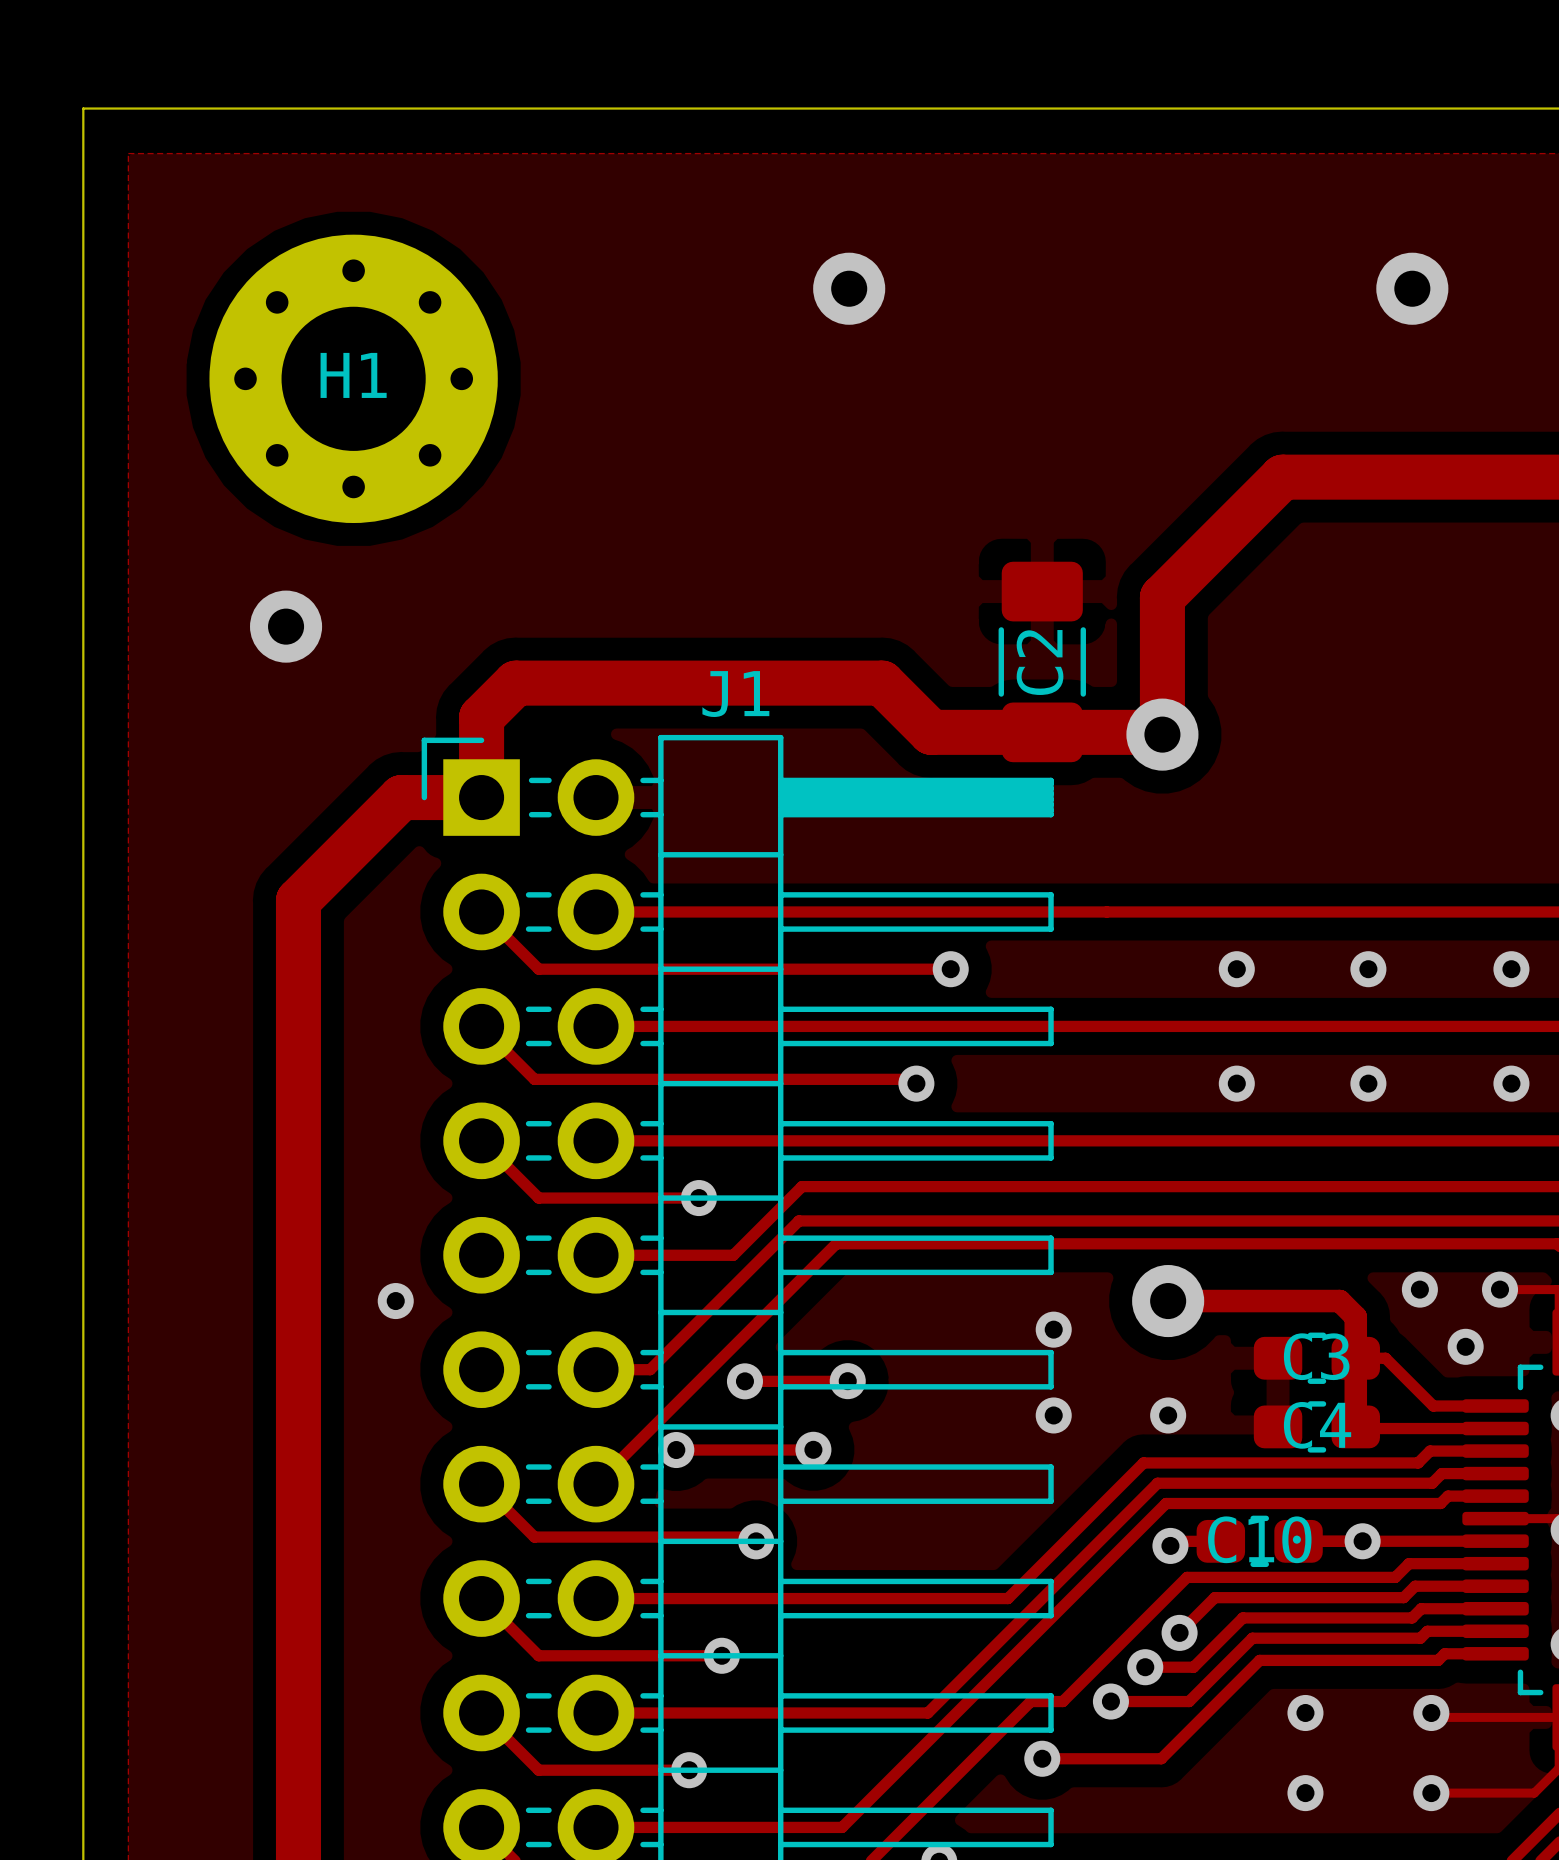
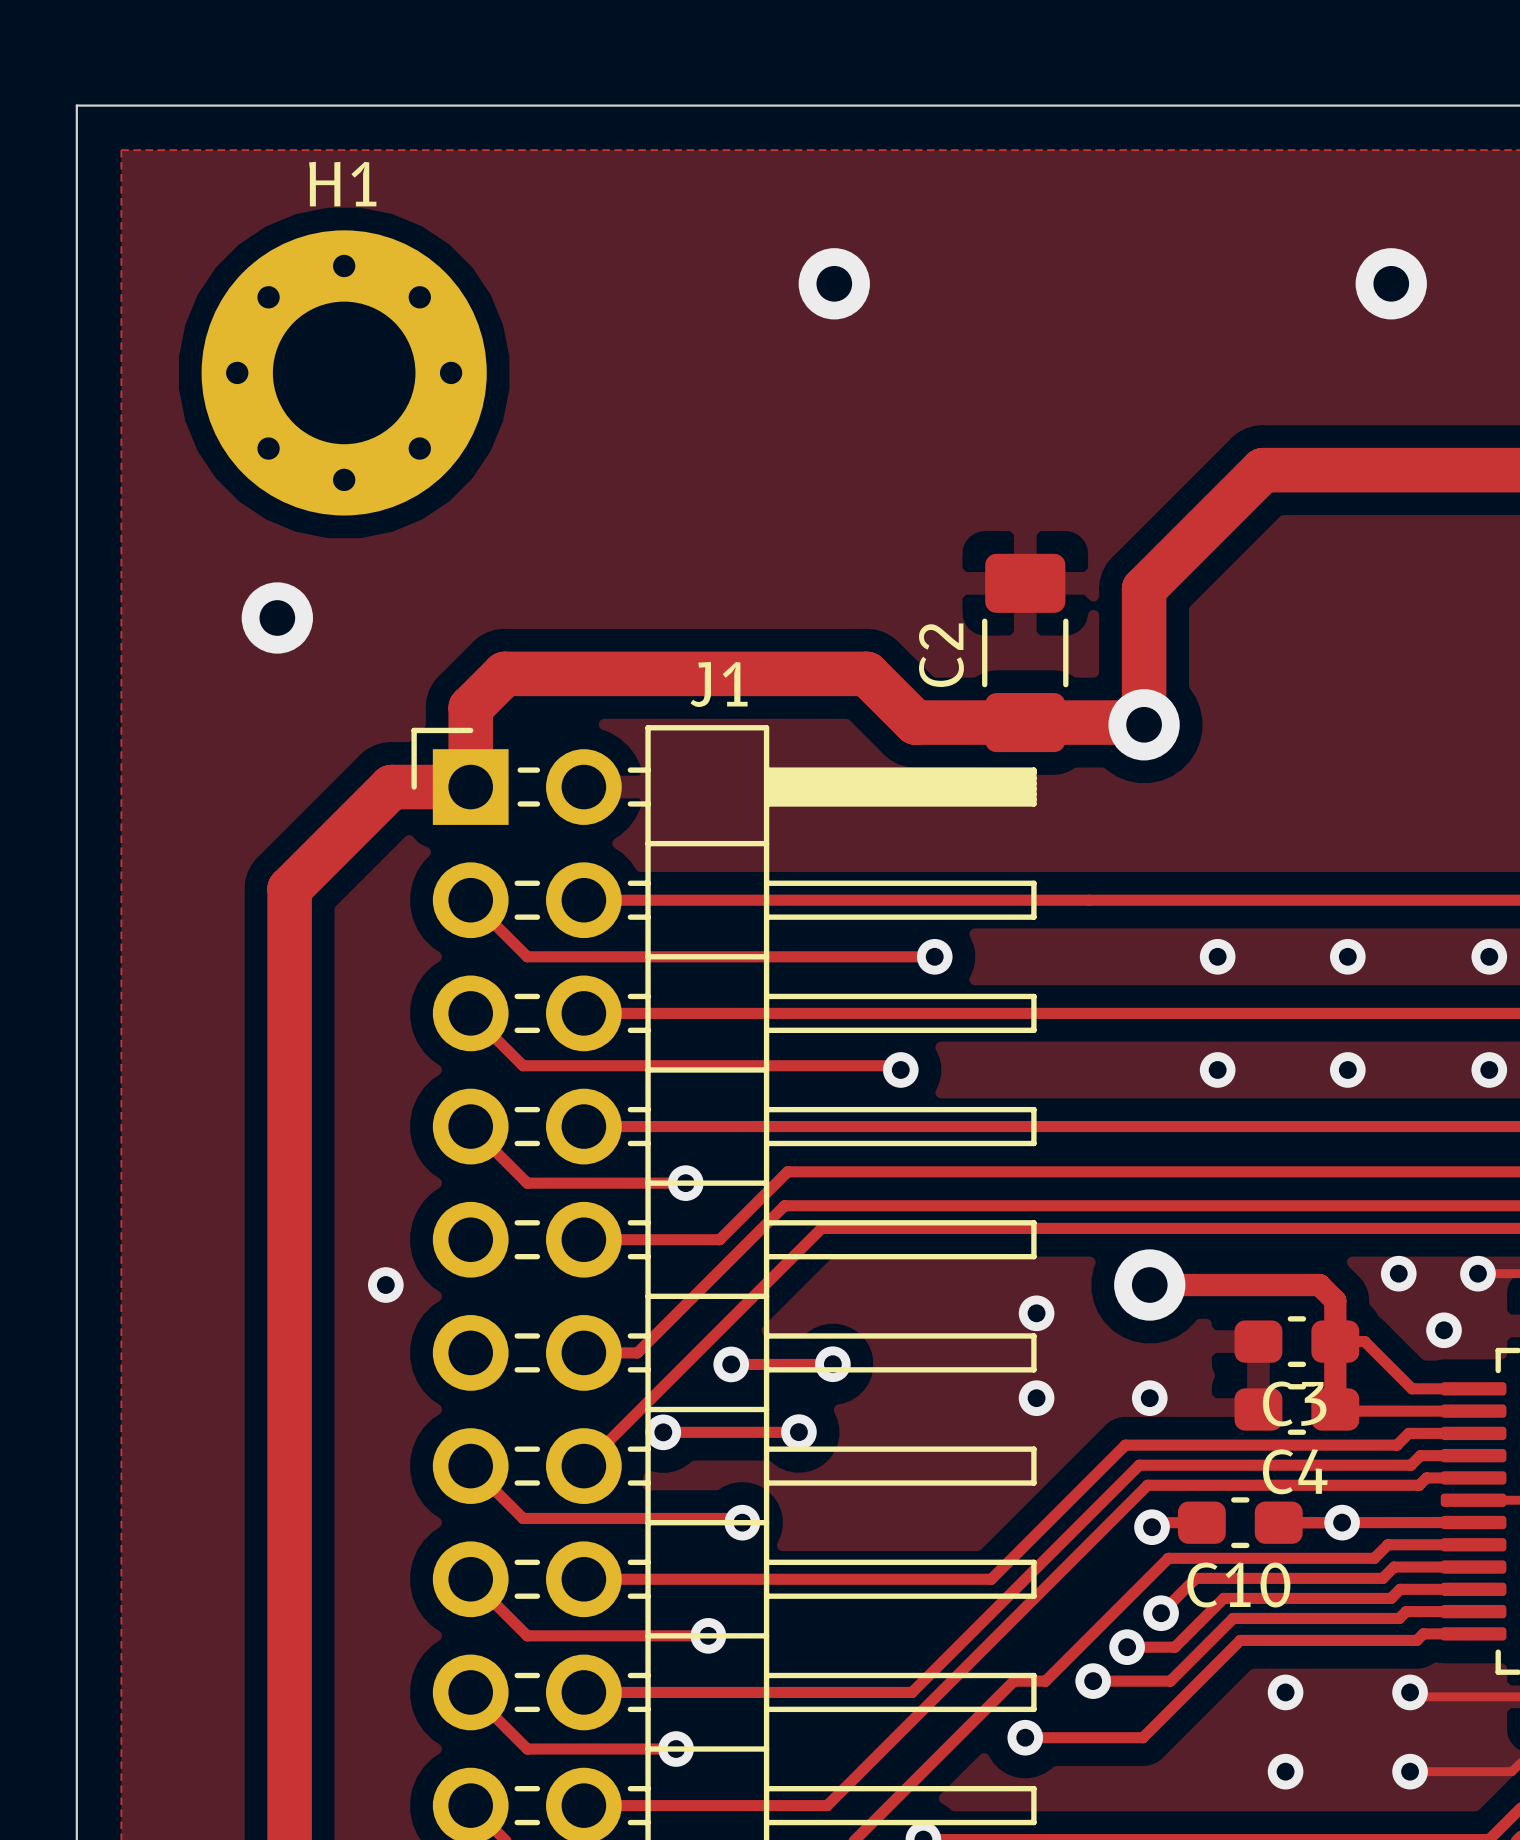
H1 name position: H1 (353, 375) -> H1 (342, 184)
C2 name position: C2 (1040, 662) -> C2 (941, 655)
C3 name position: C3 (1316, 1356) -> C3 (1294, 1403)
C4 name position: C4 (1317, 1425) -> C4 (1295, 1471)
C10 name position: C10 (1259, 1539) -> C10 (1238, 1584)

